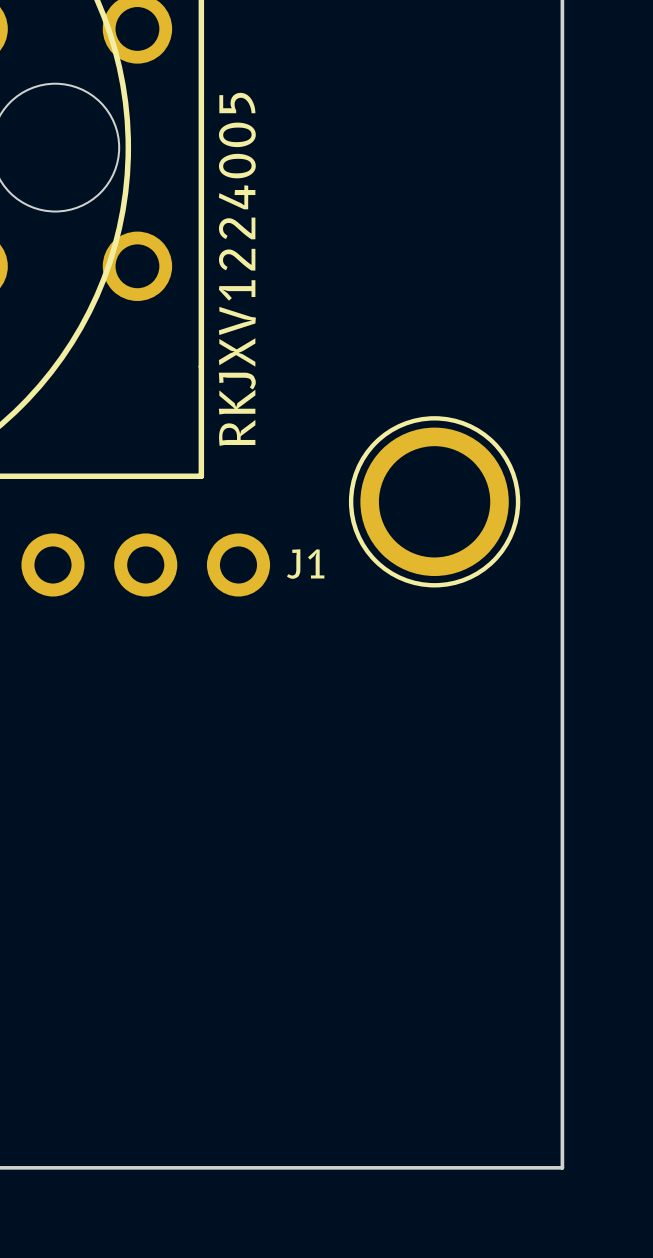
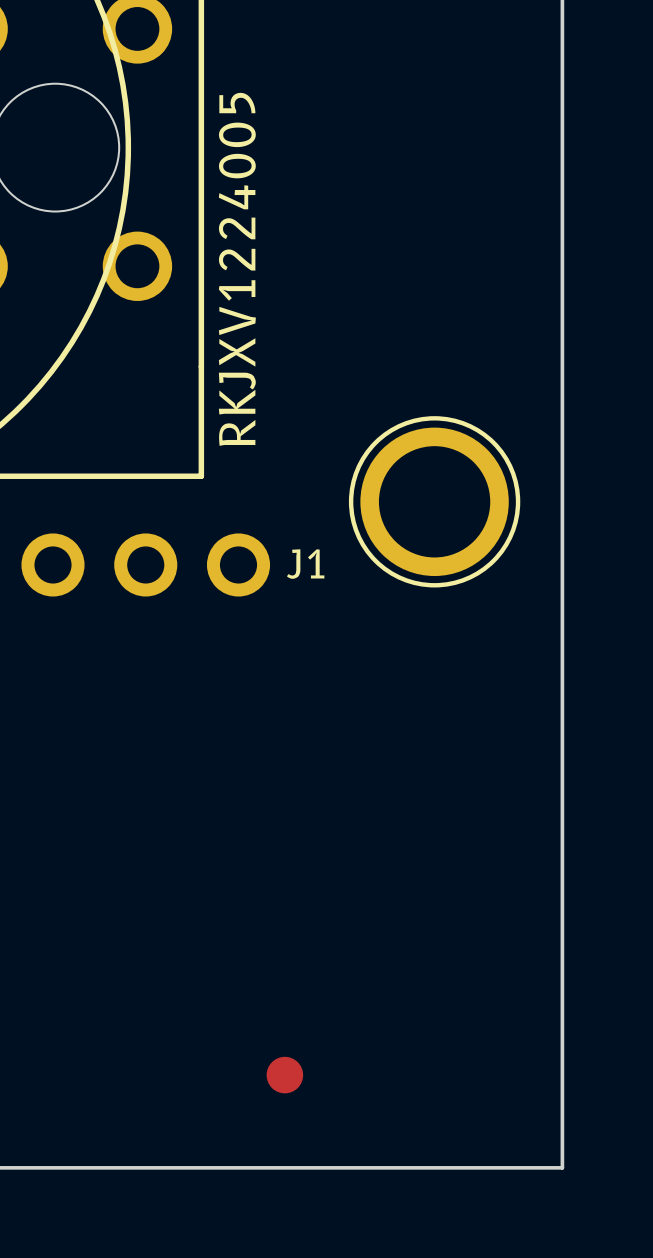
part: none -> (284, 1075)

